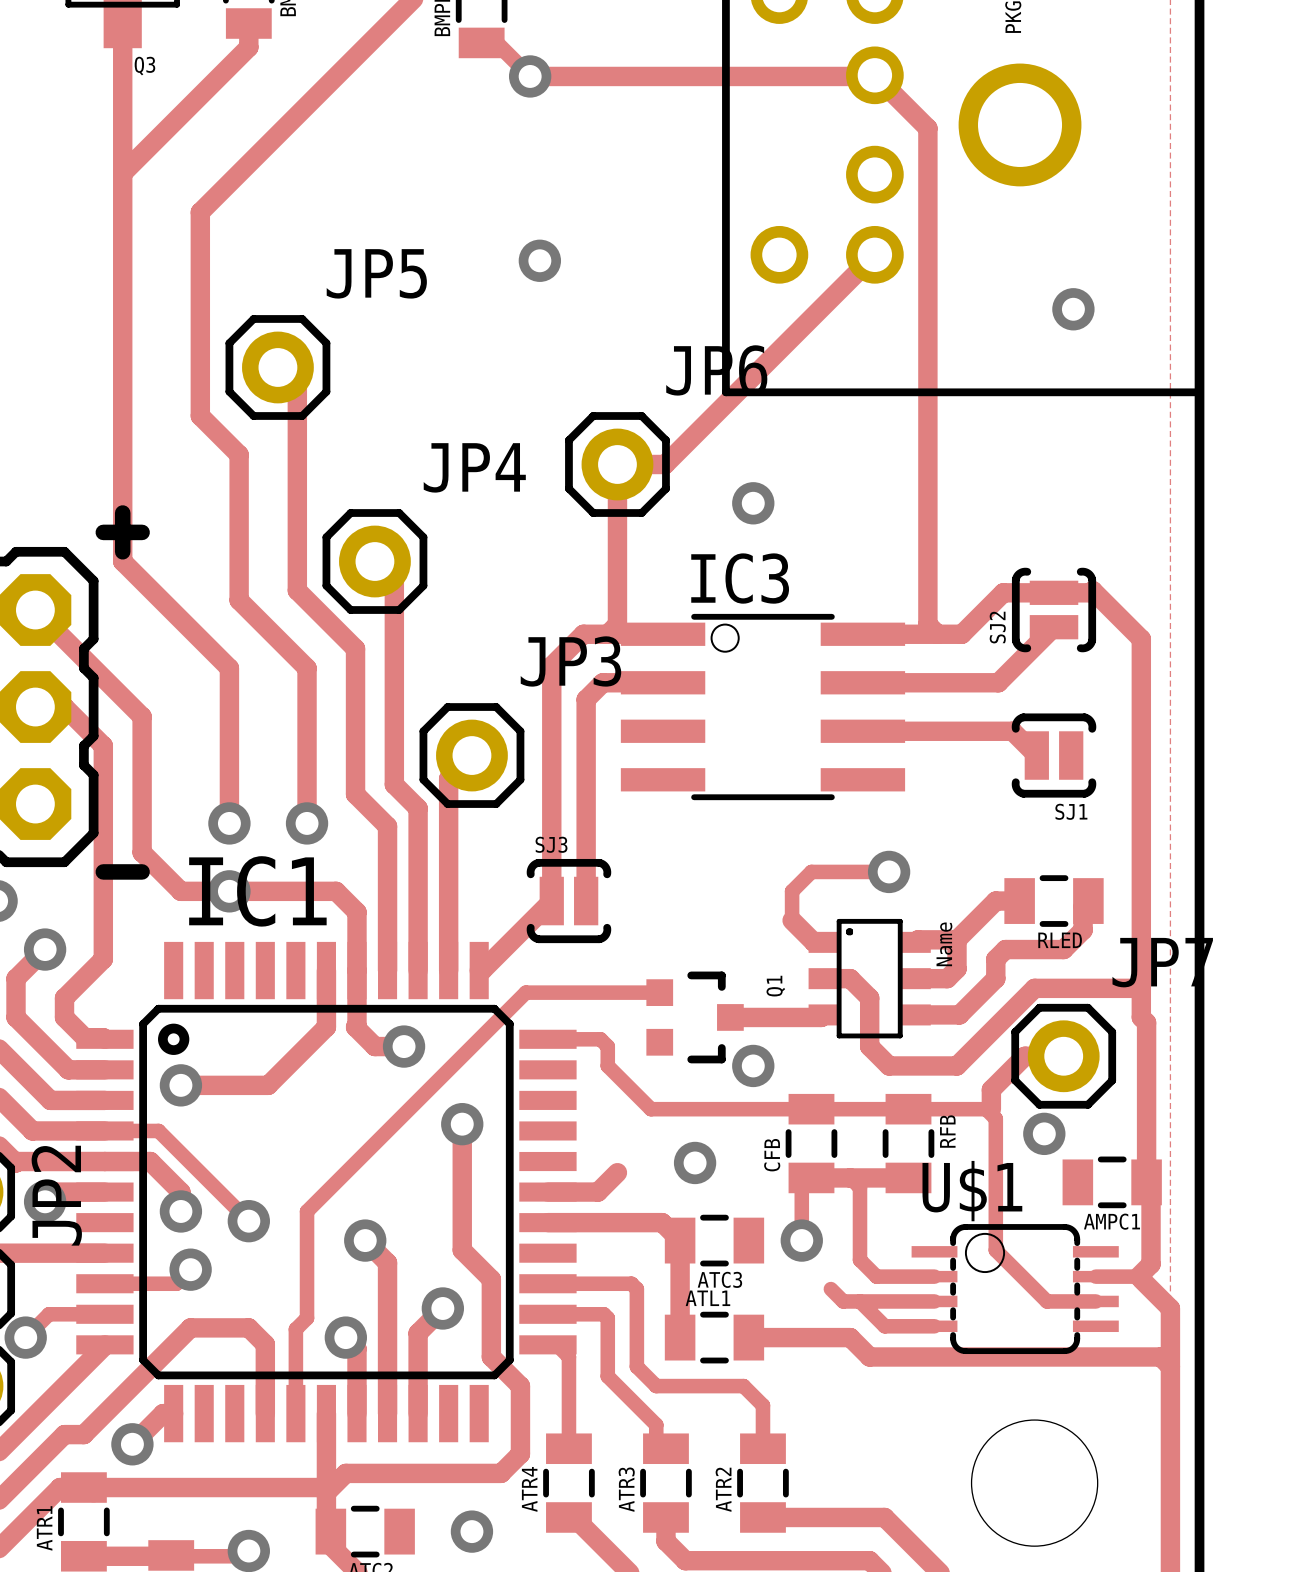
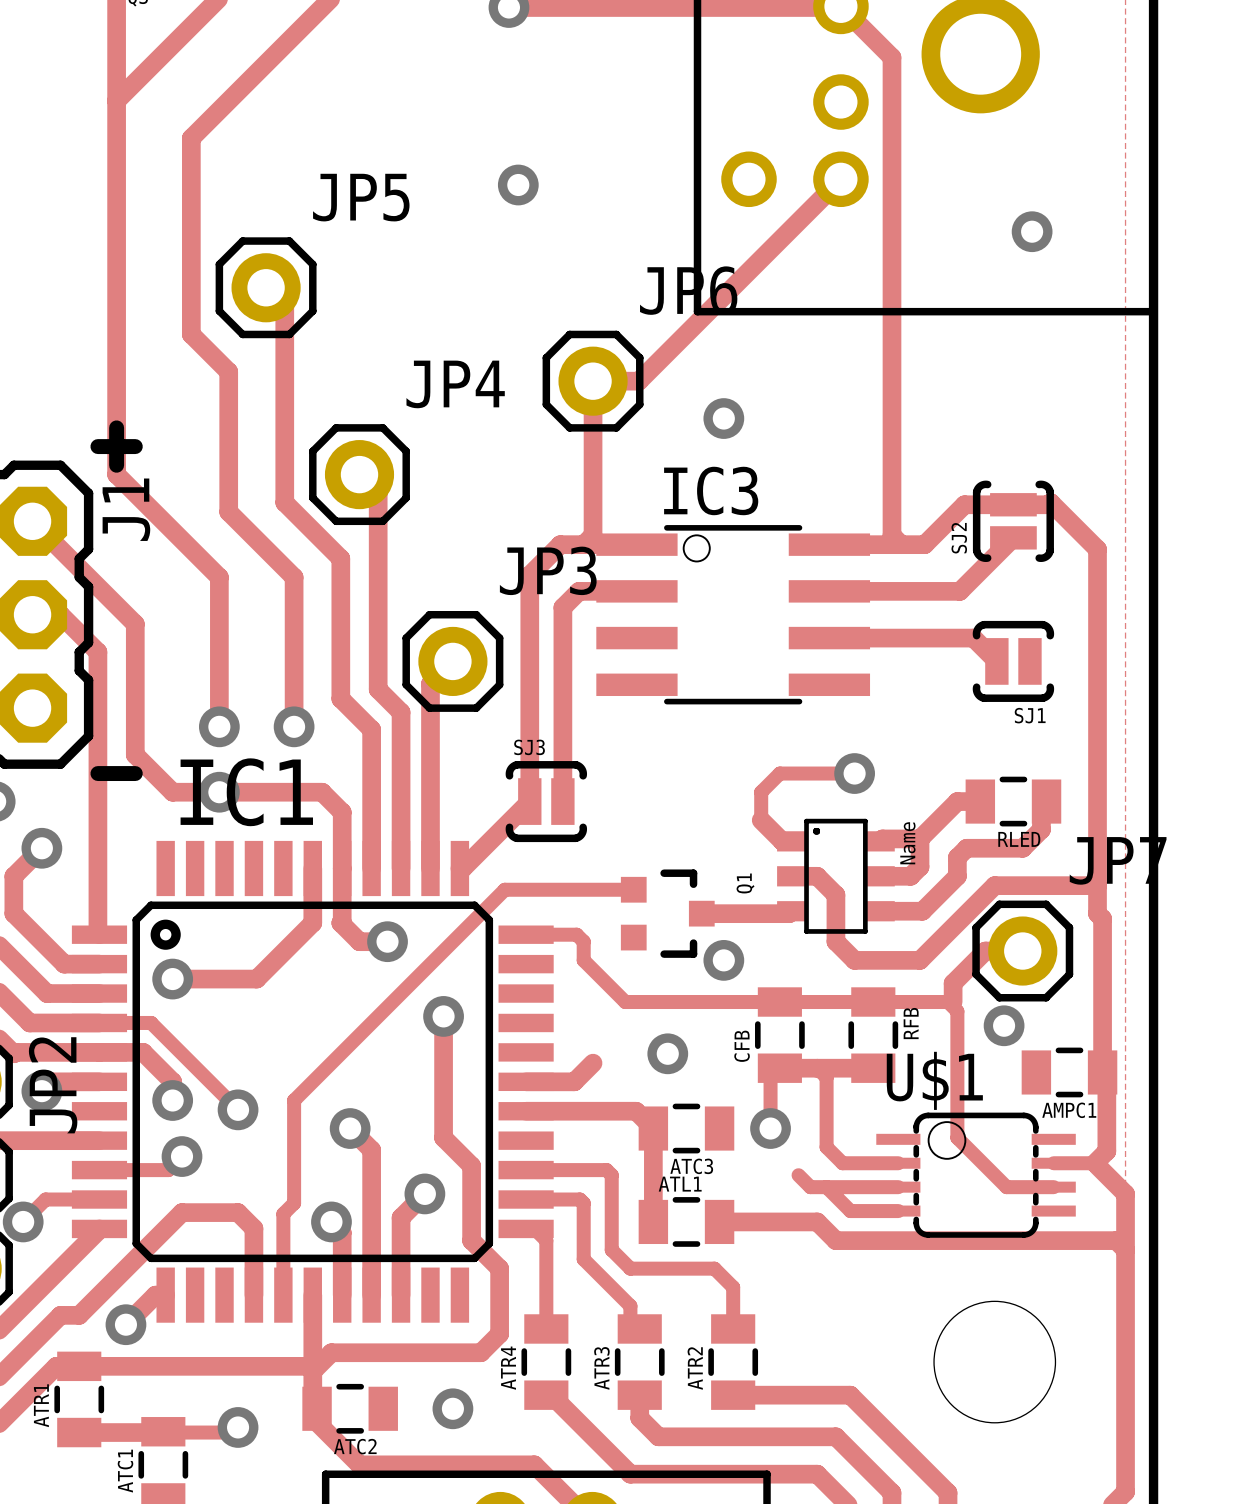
J1 name: none -> J1 (126, 509)
track: (103, 959) (64, 998) (64, 1017) (84, 1037) (103, 1037) -> (97, 857) (97, 933)

